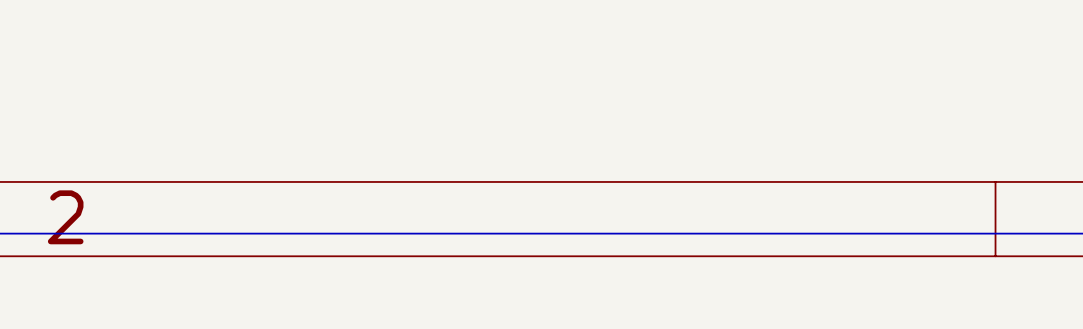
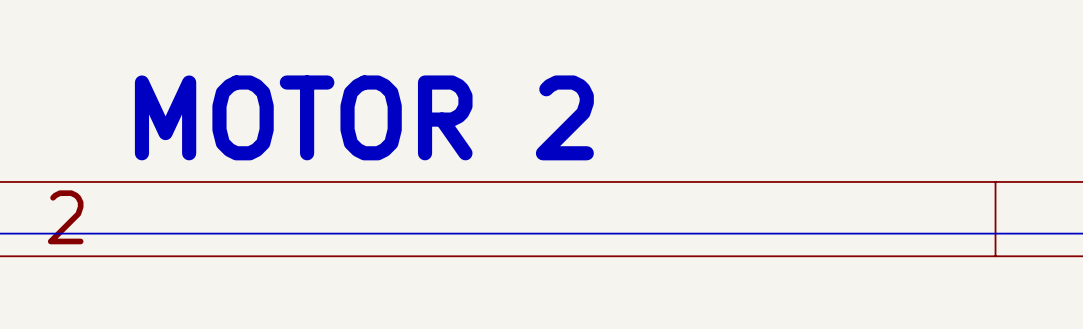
text: none -> MOTOR 2 (364, 117)

